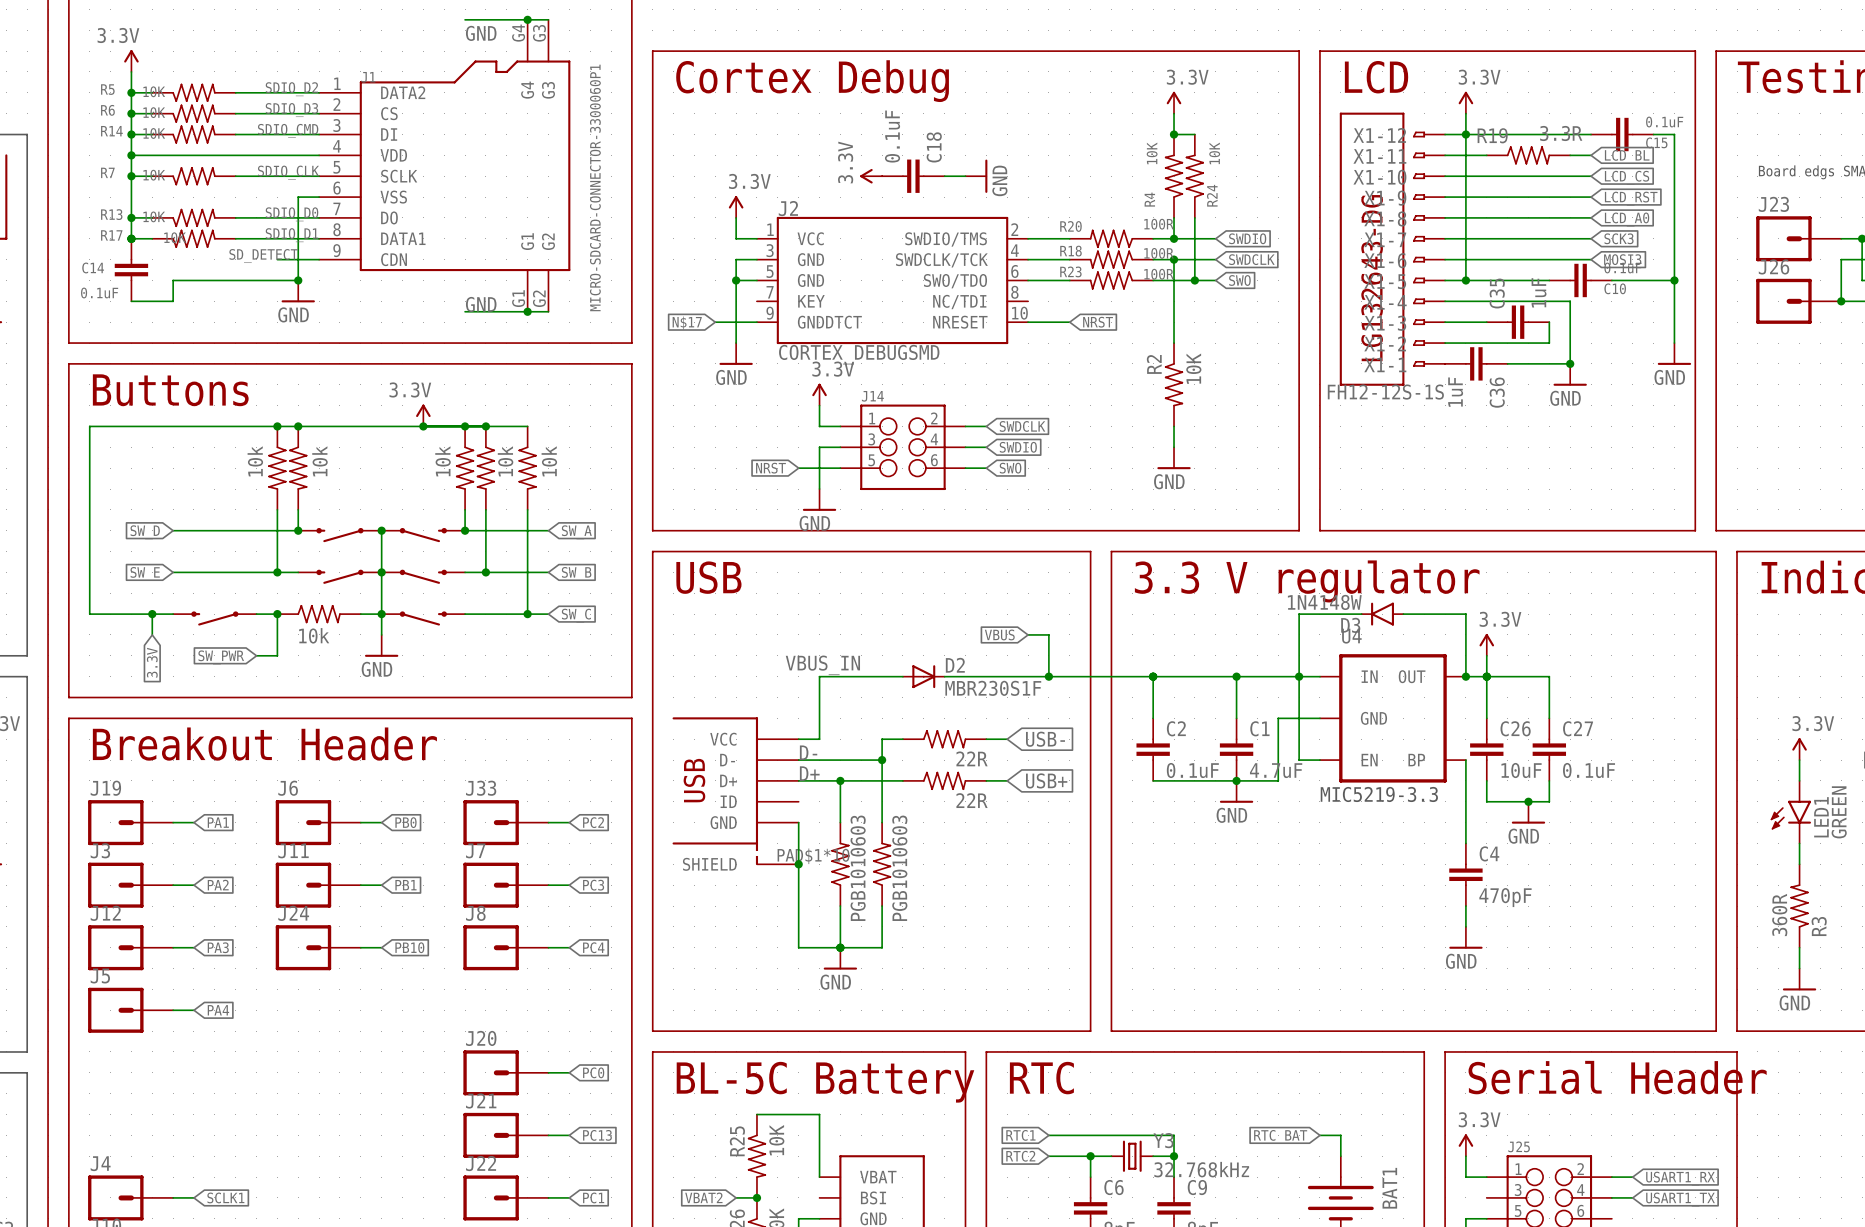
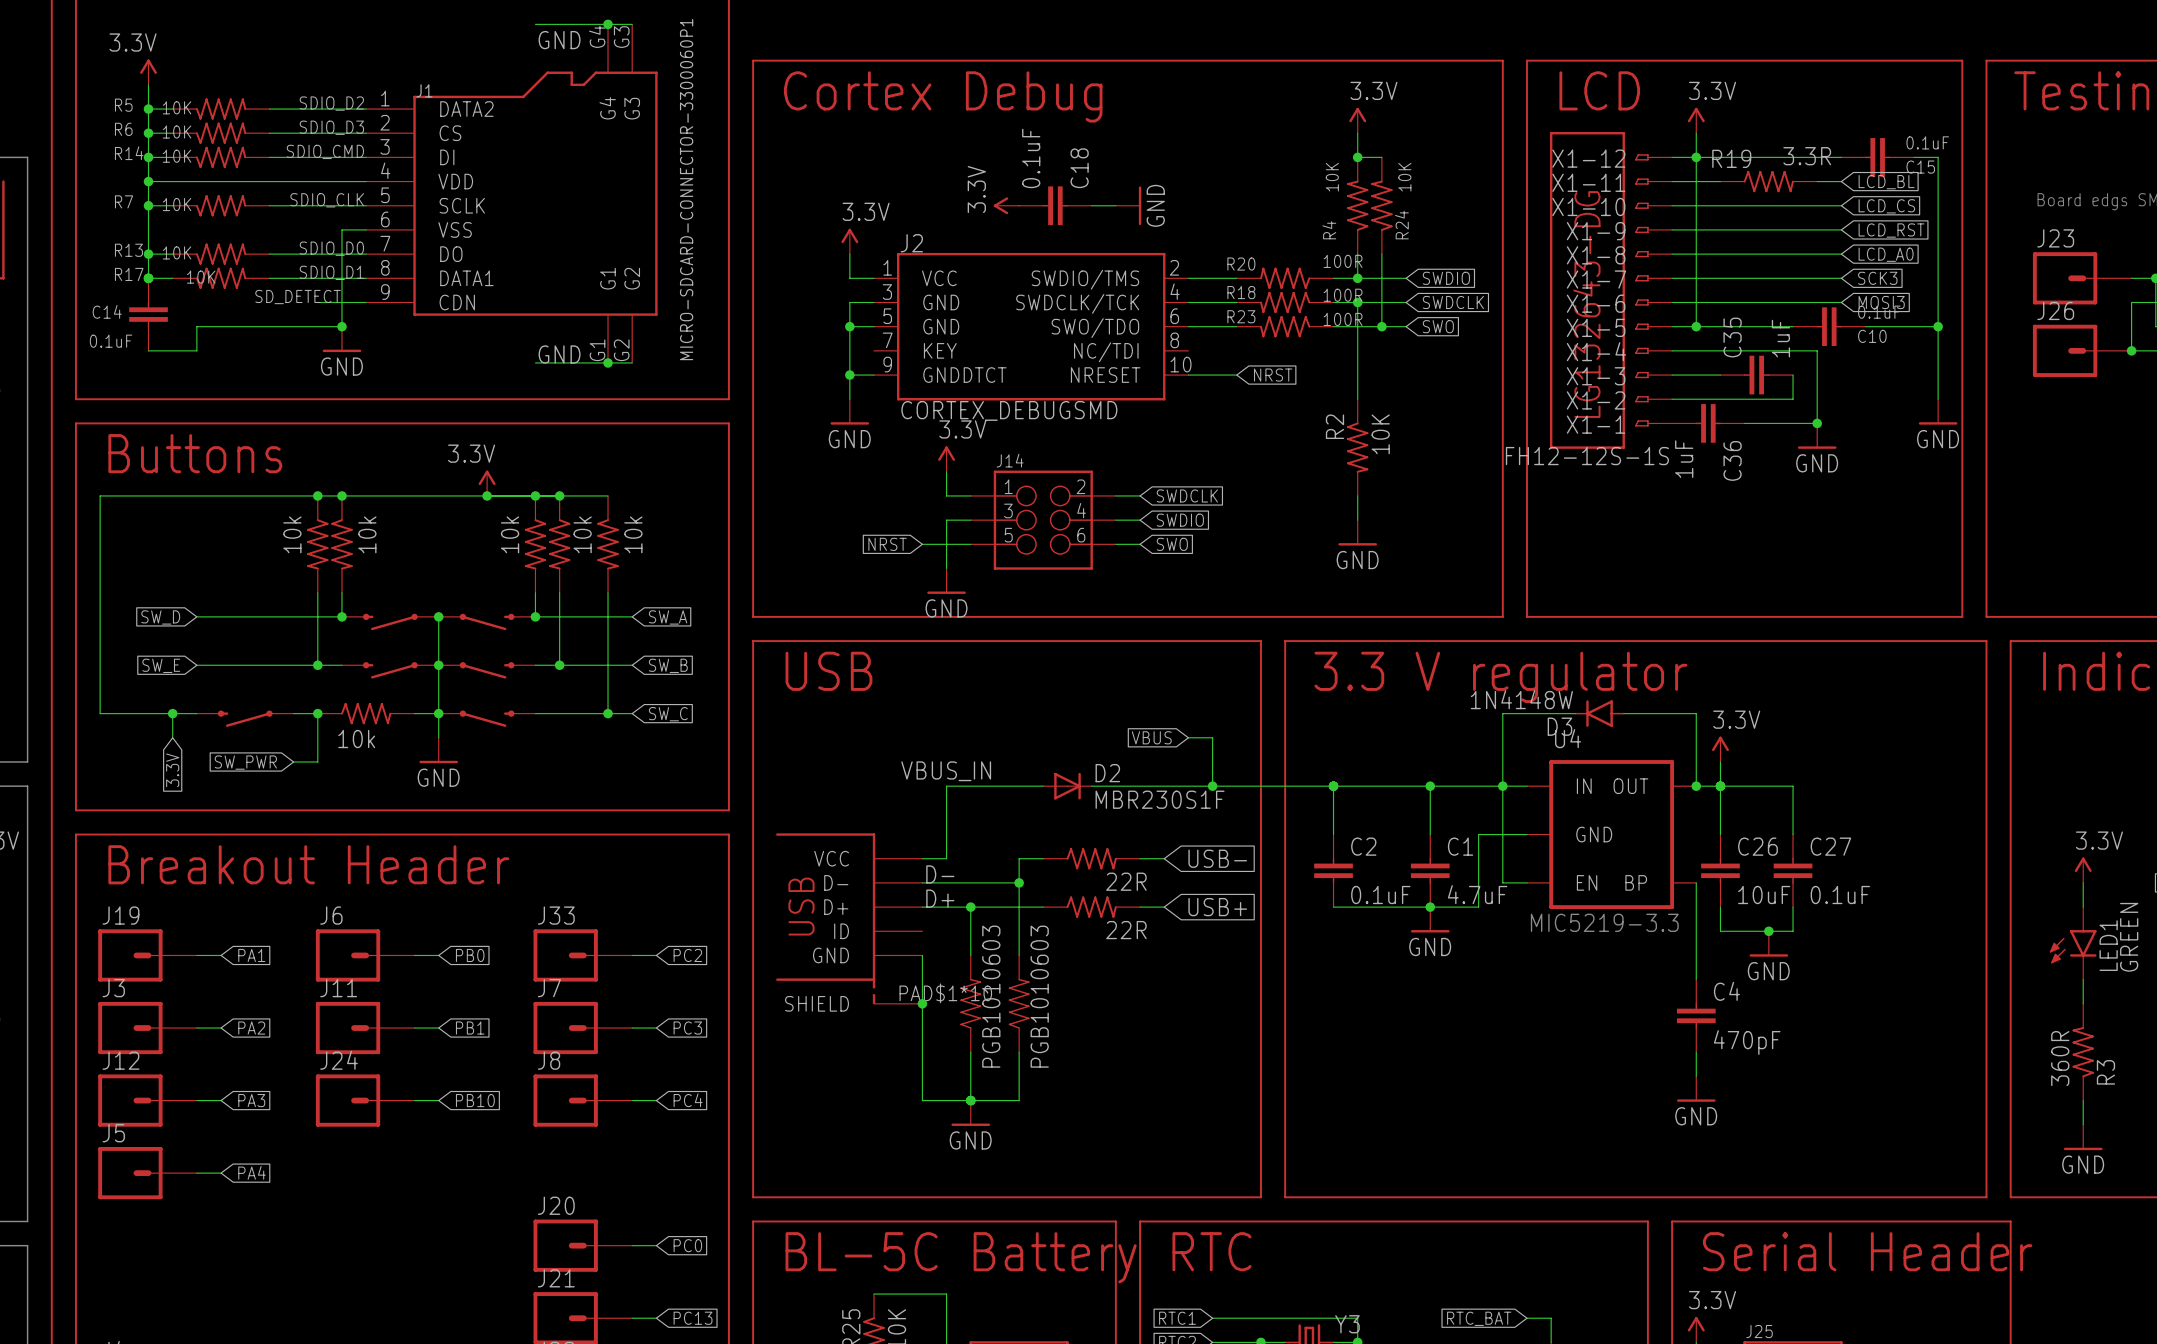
wire: (715, 322) (736, 322) -> none
junction: none -> (849, 375)
global label: N$17 (687, 323) -> none

